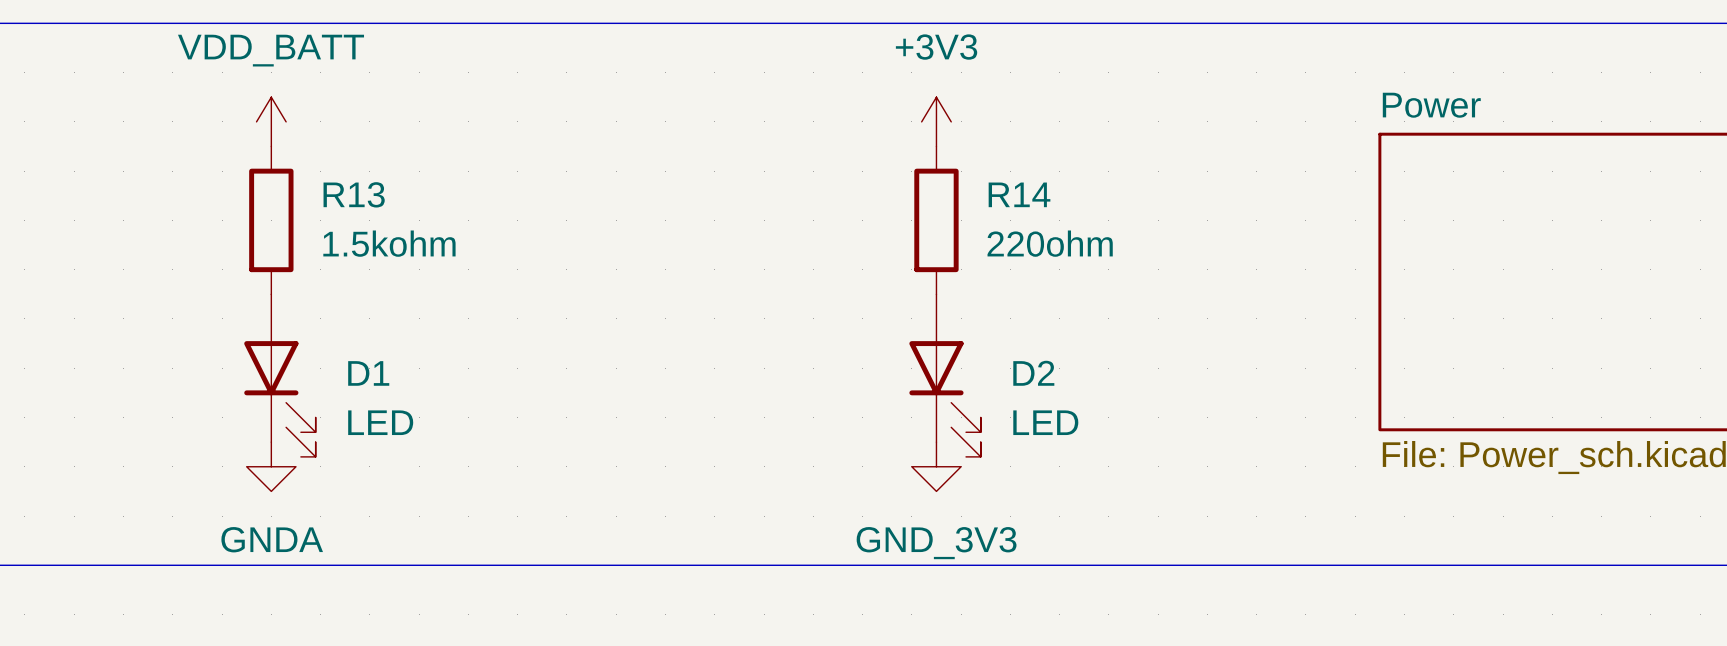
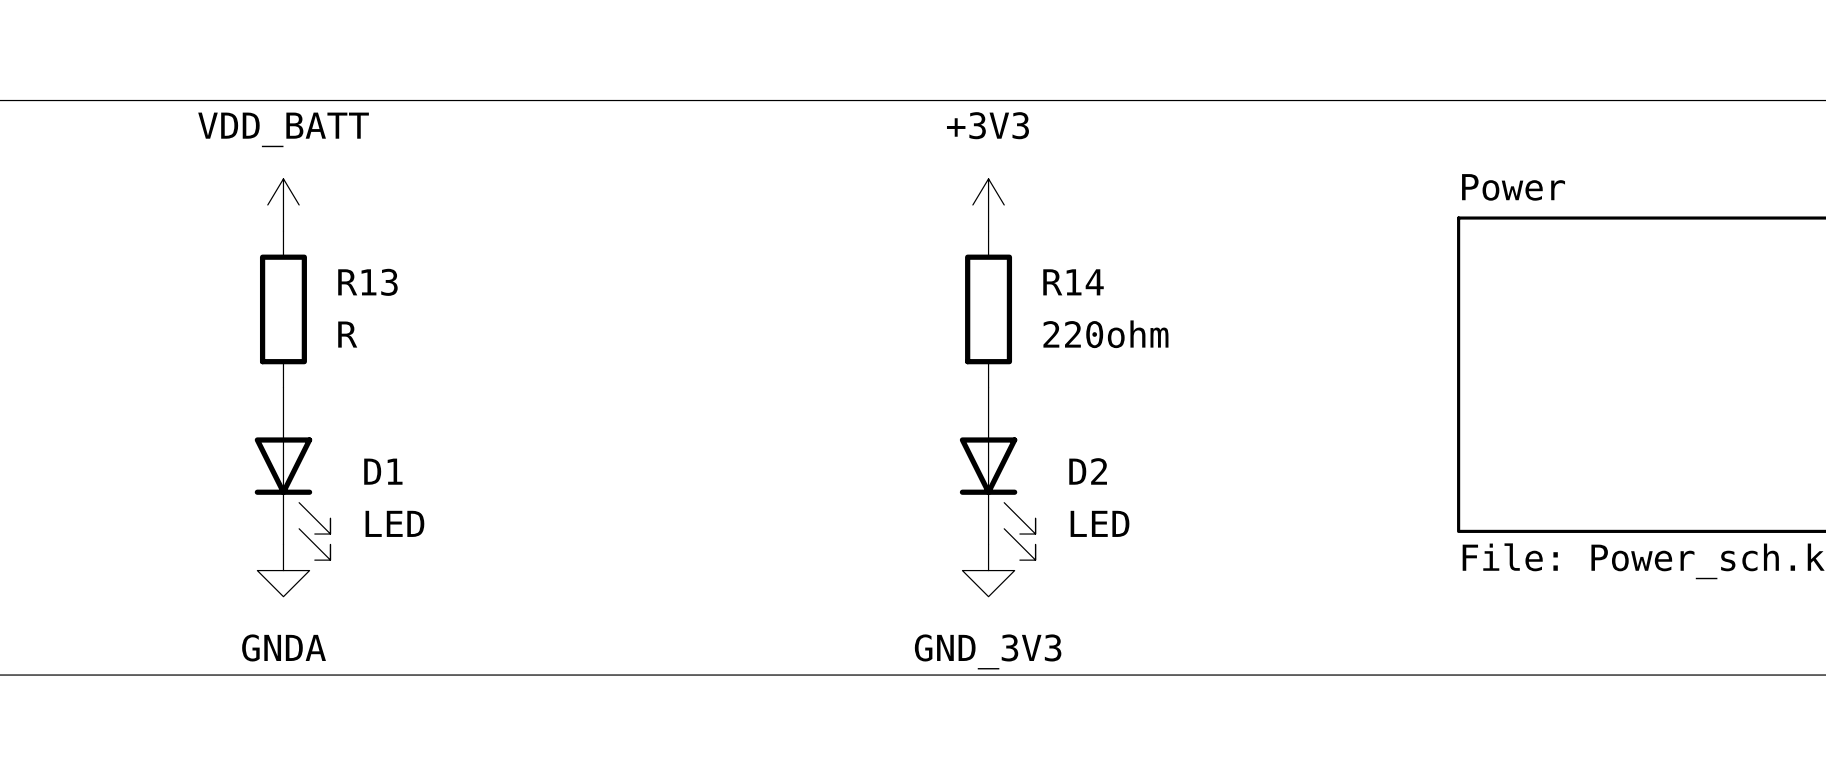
R13 value: 1.5kohm (389, 243) -> R (347, 334)

